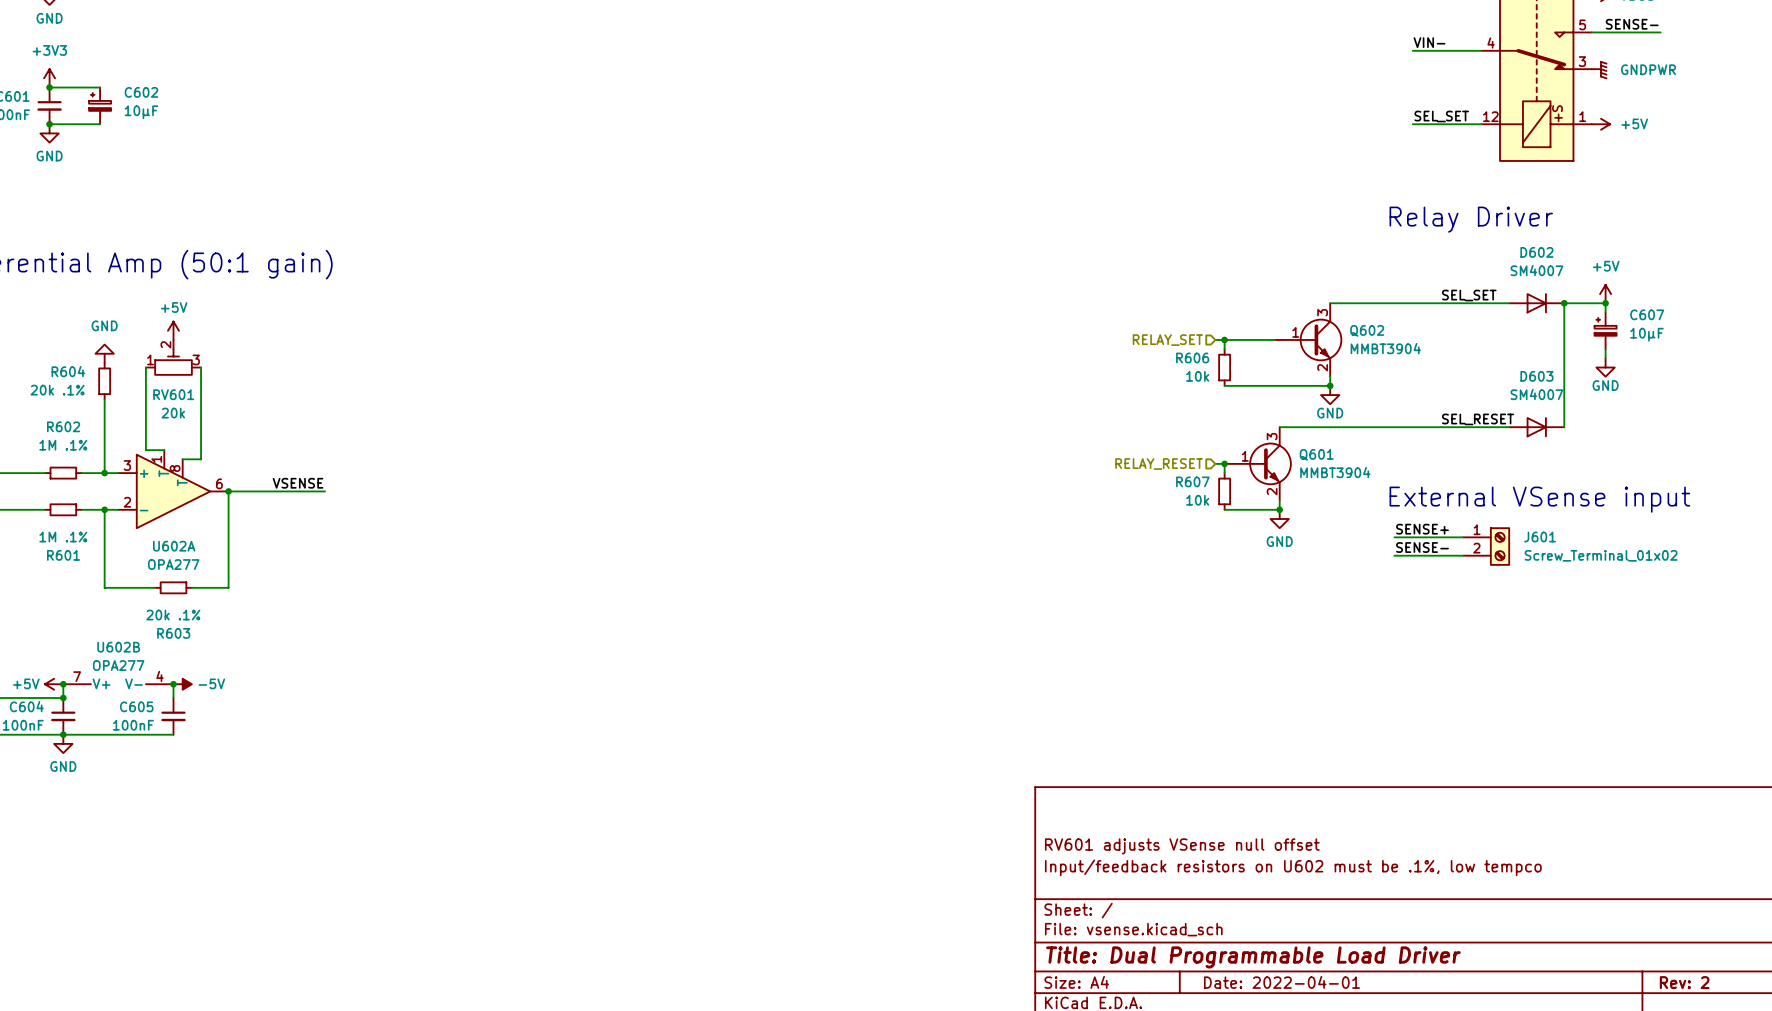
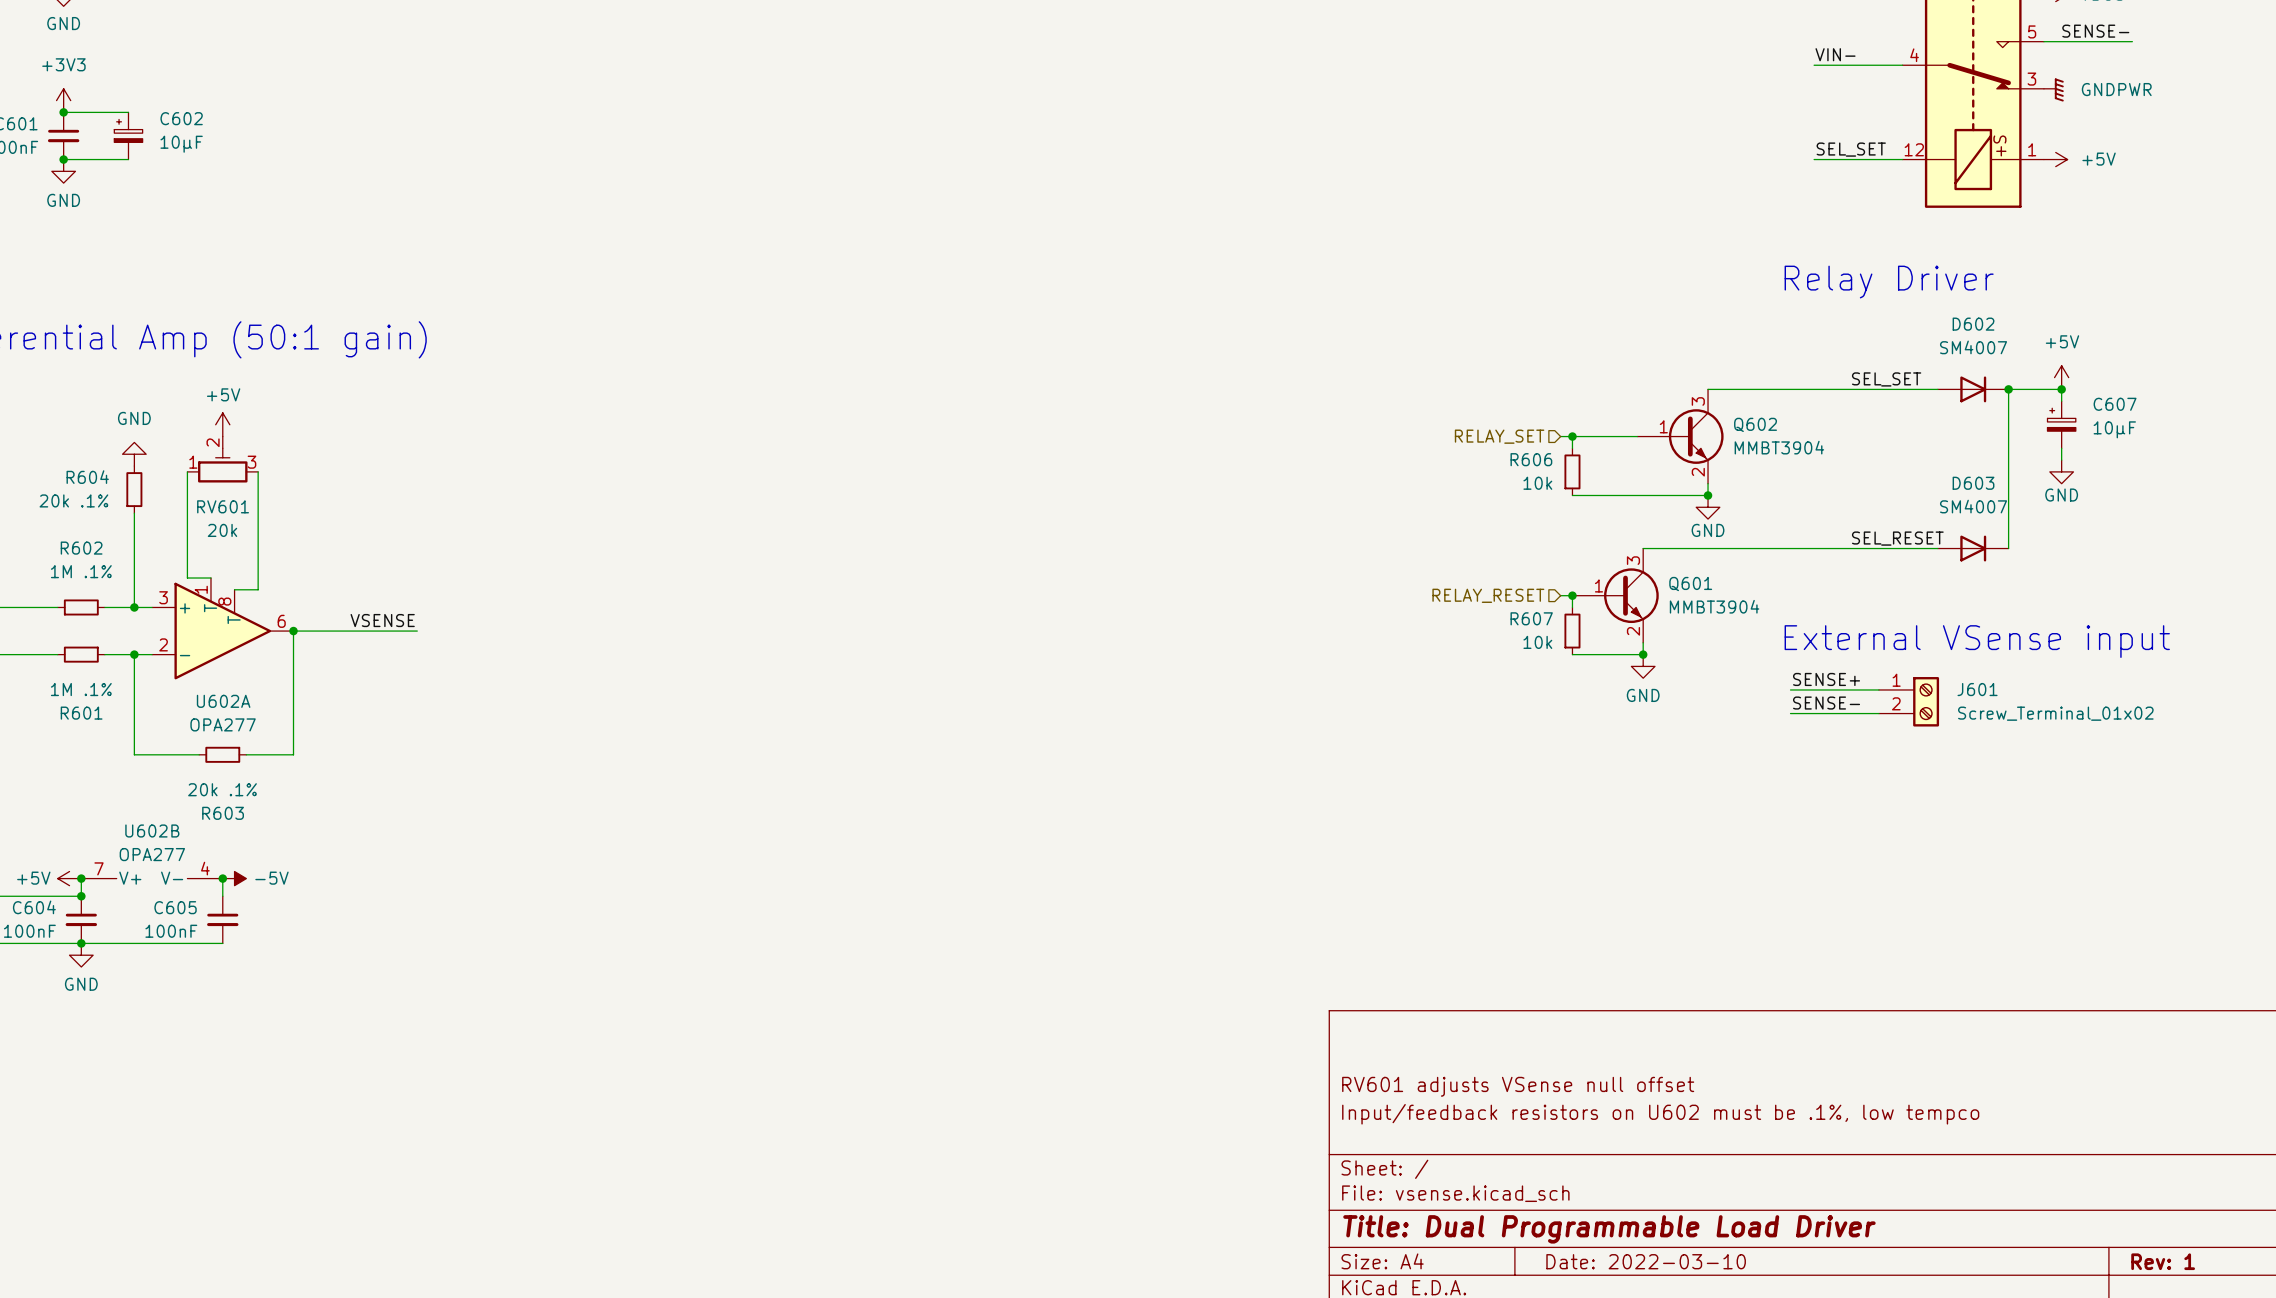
title block: Date: 2022-04-01 (1281, 982) -> Date: 2022-03-10 (1646, 1261)
title block: Rev: 2 (1684, 982) -> Rev: 1 (2163, 1261)

